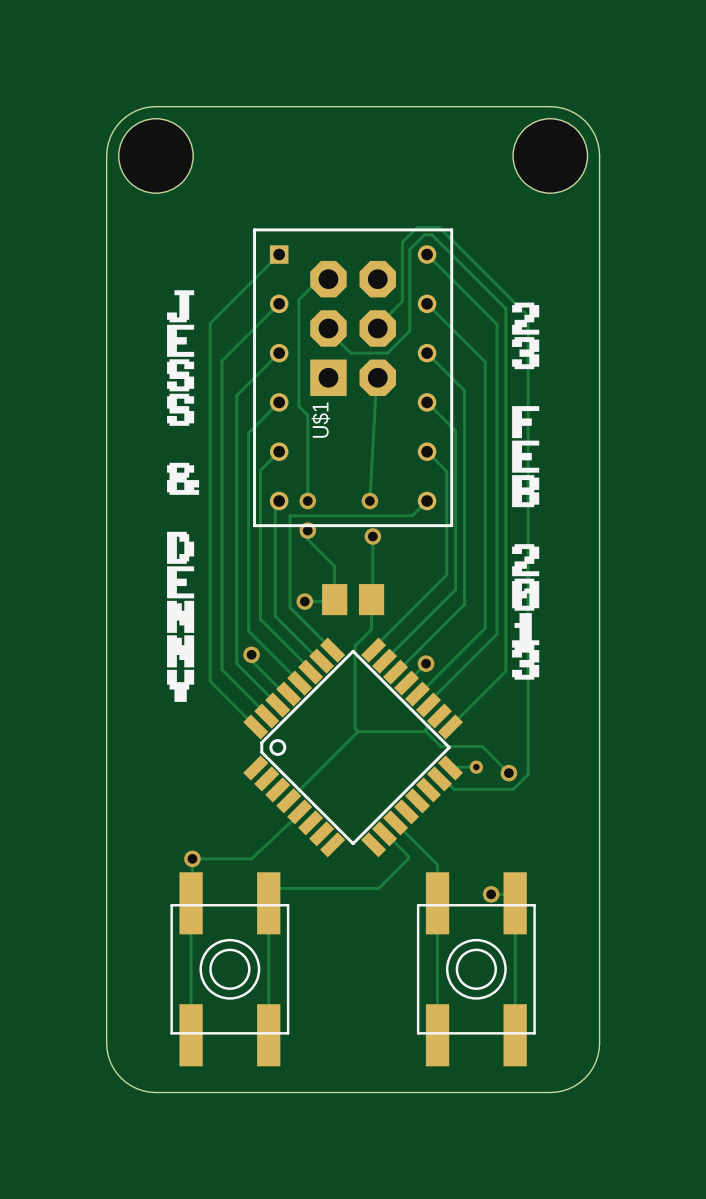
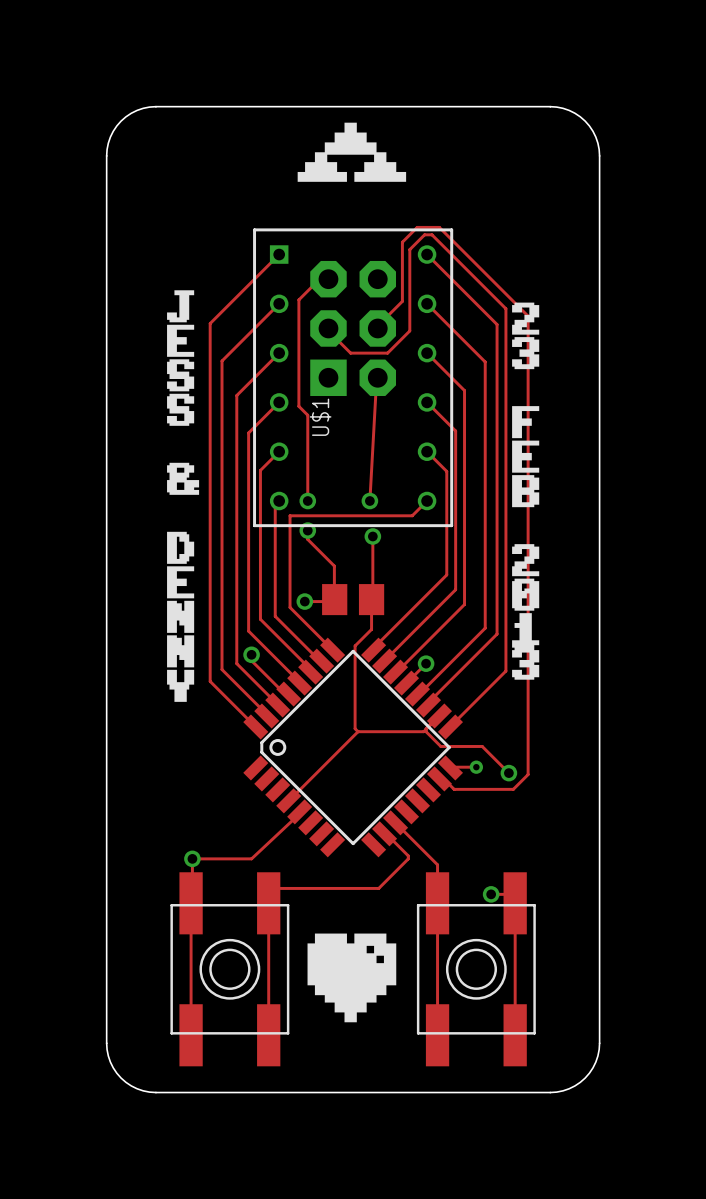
drawing: none -> [297, 122, 407, 182]
hole: (155, 155) -> none
hole: (550, 155) -> none
drawing: none -> [307, 933, 397, 1023]

